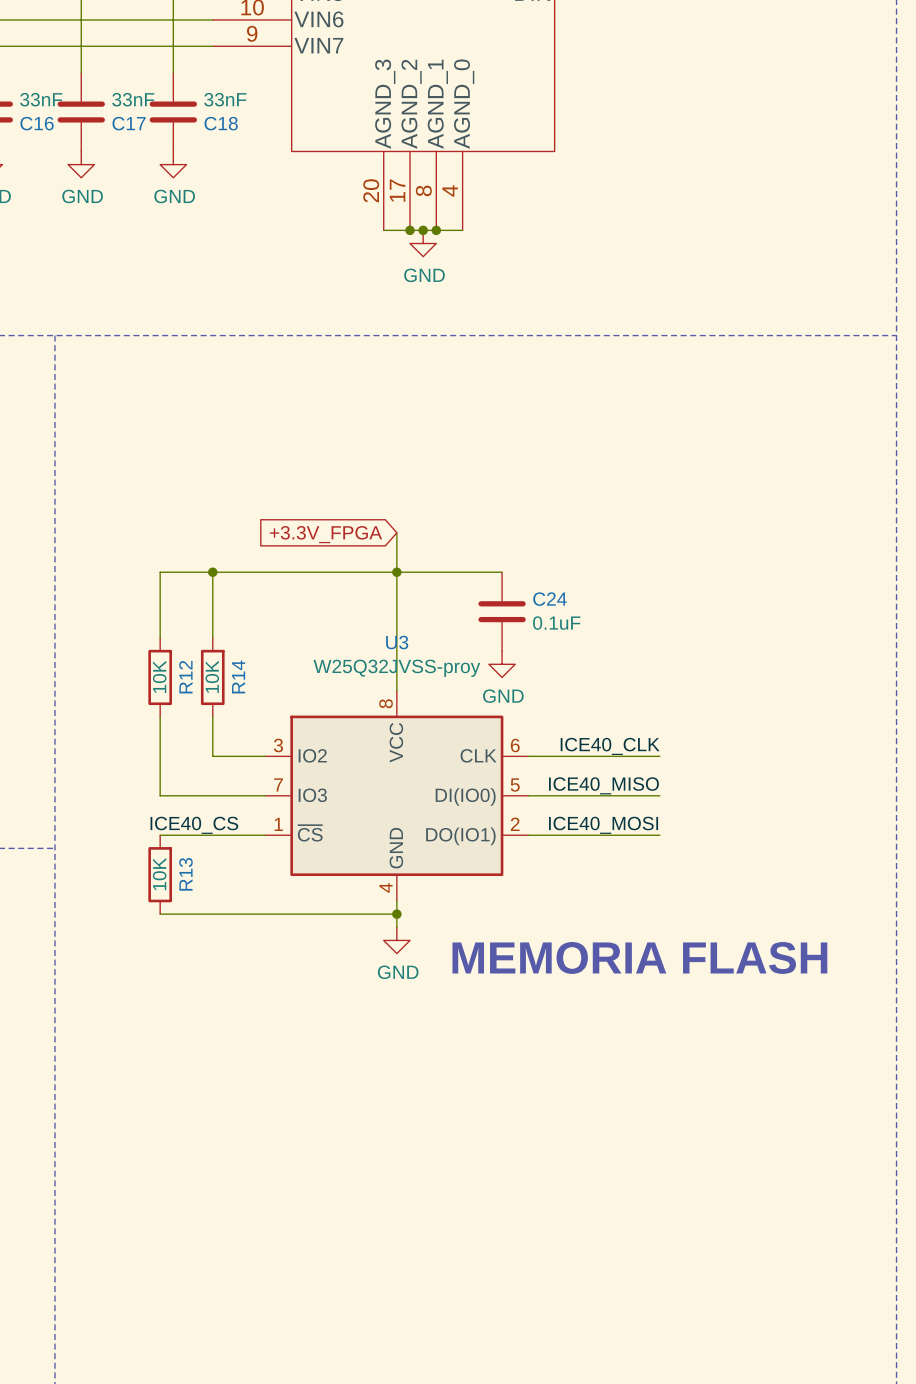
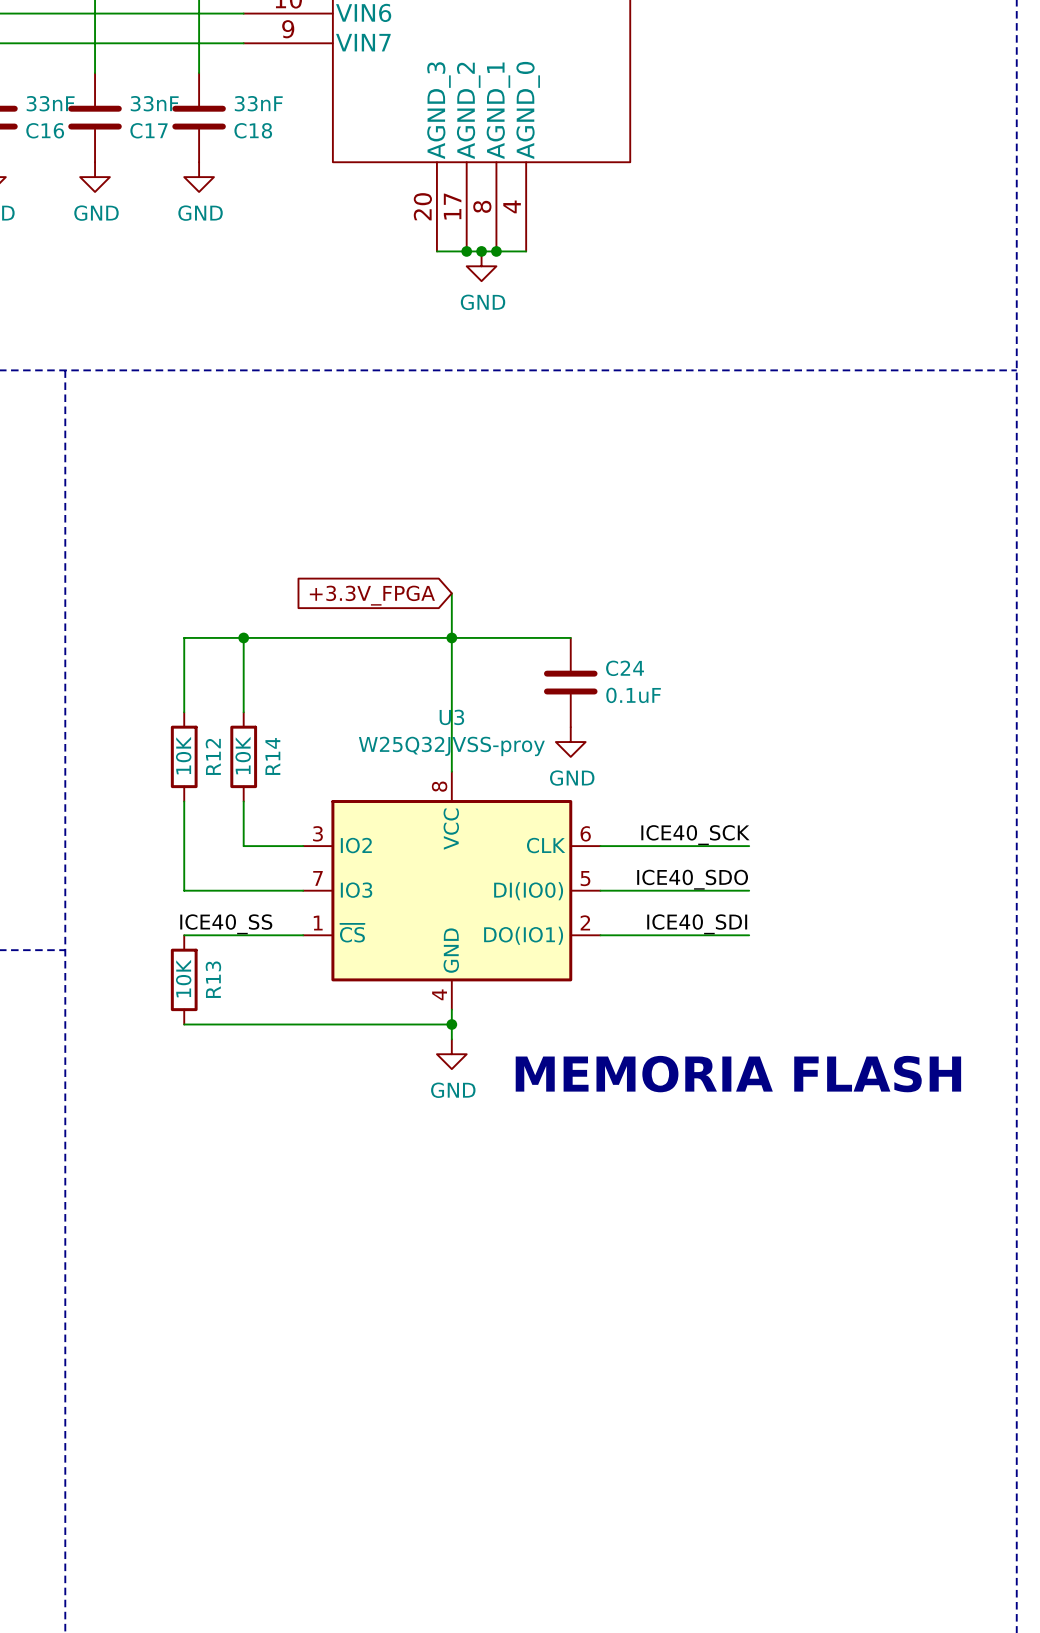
label: ICE40_CLK (610, 746) -> ICE40_SCK (695, 835)
label: ICE40_MISO (603, 785) -> ICE40_SDO (692, 879)
label: ICE40_CS (194, 825) -> ICE40_SS (226, 924)
label: ICE40_MOSI (603, 825) -> ICE40_SDI (697, 924)

